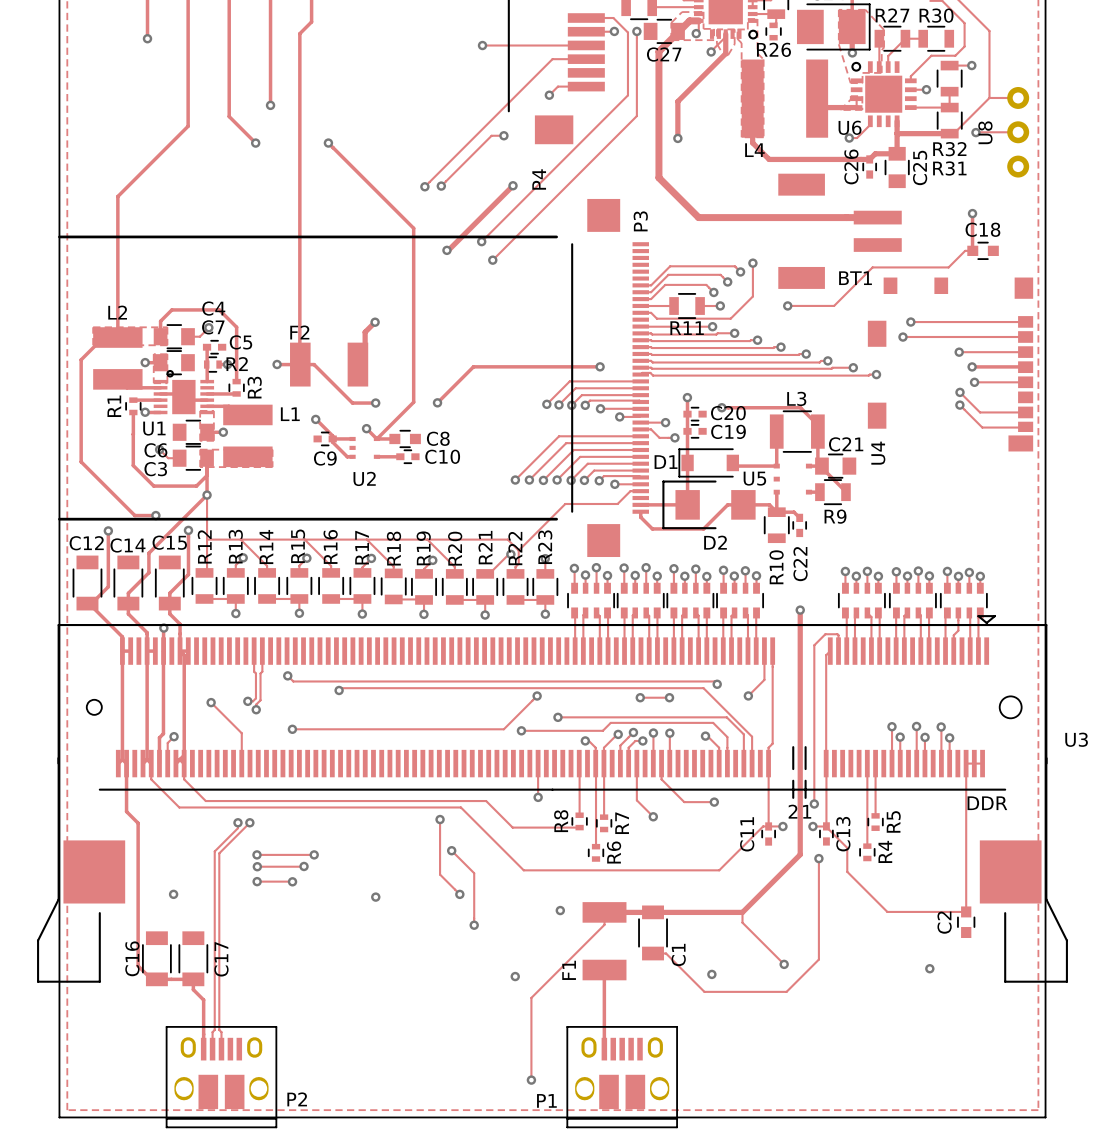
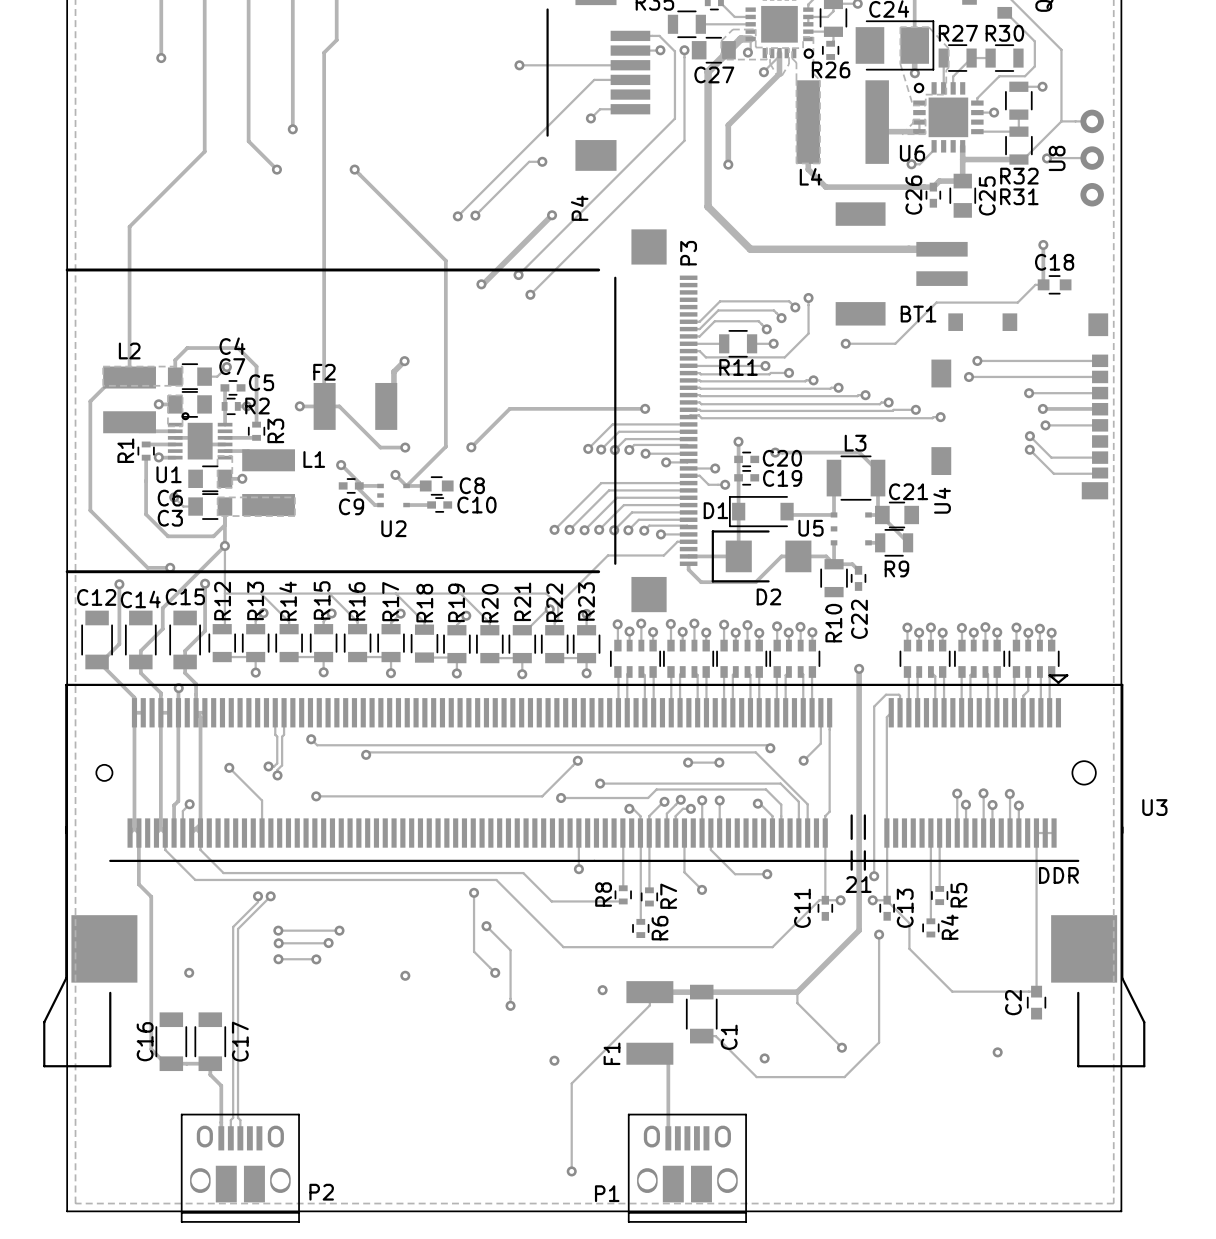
track: (604, 970) (604, 1049) -> (649, 1053) (662, 1053) (668, 1059) (668, 1138)
P1 position: (622, 1077) -> (687, 1168)

